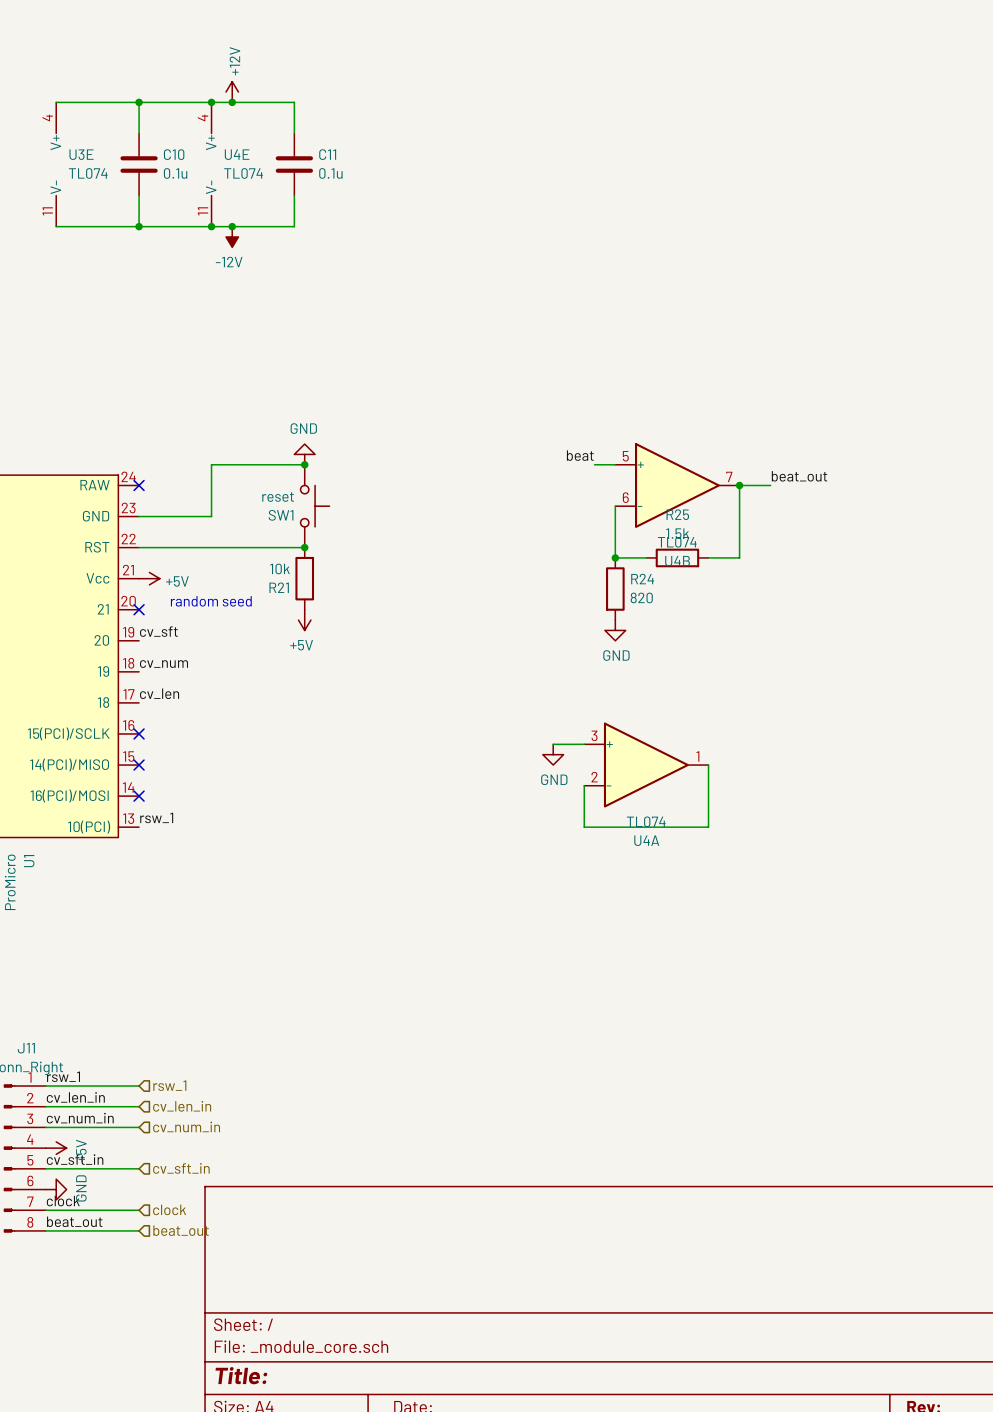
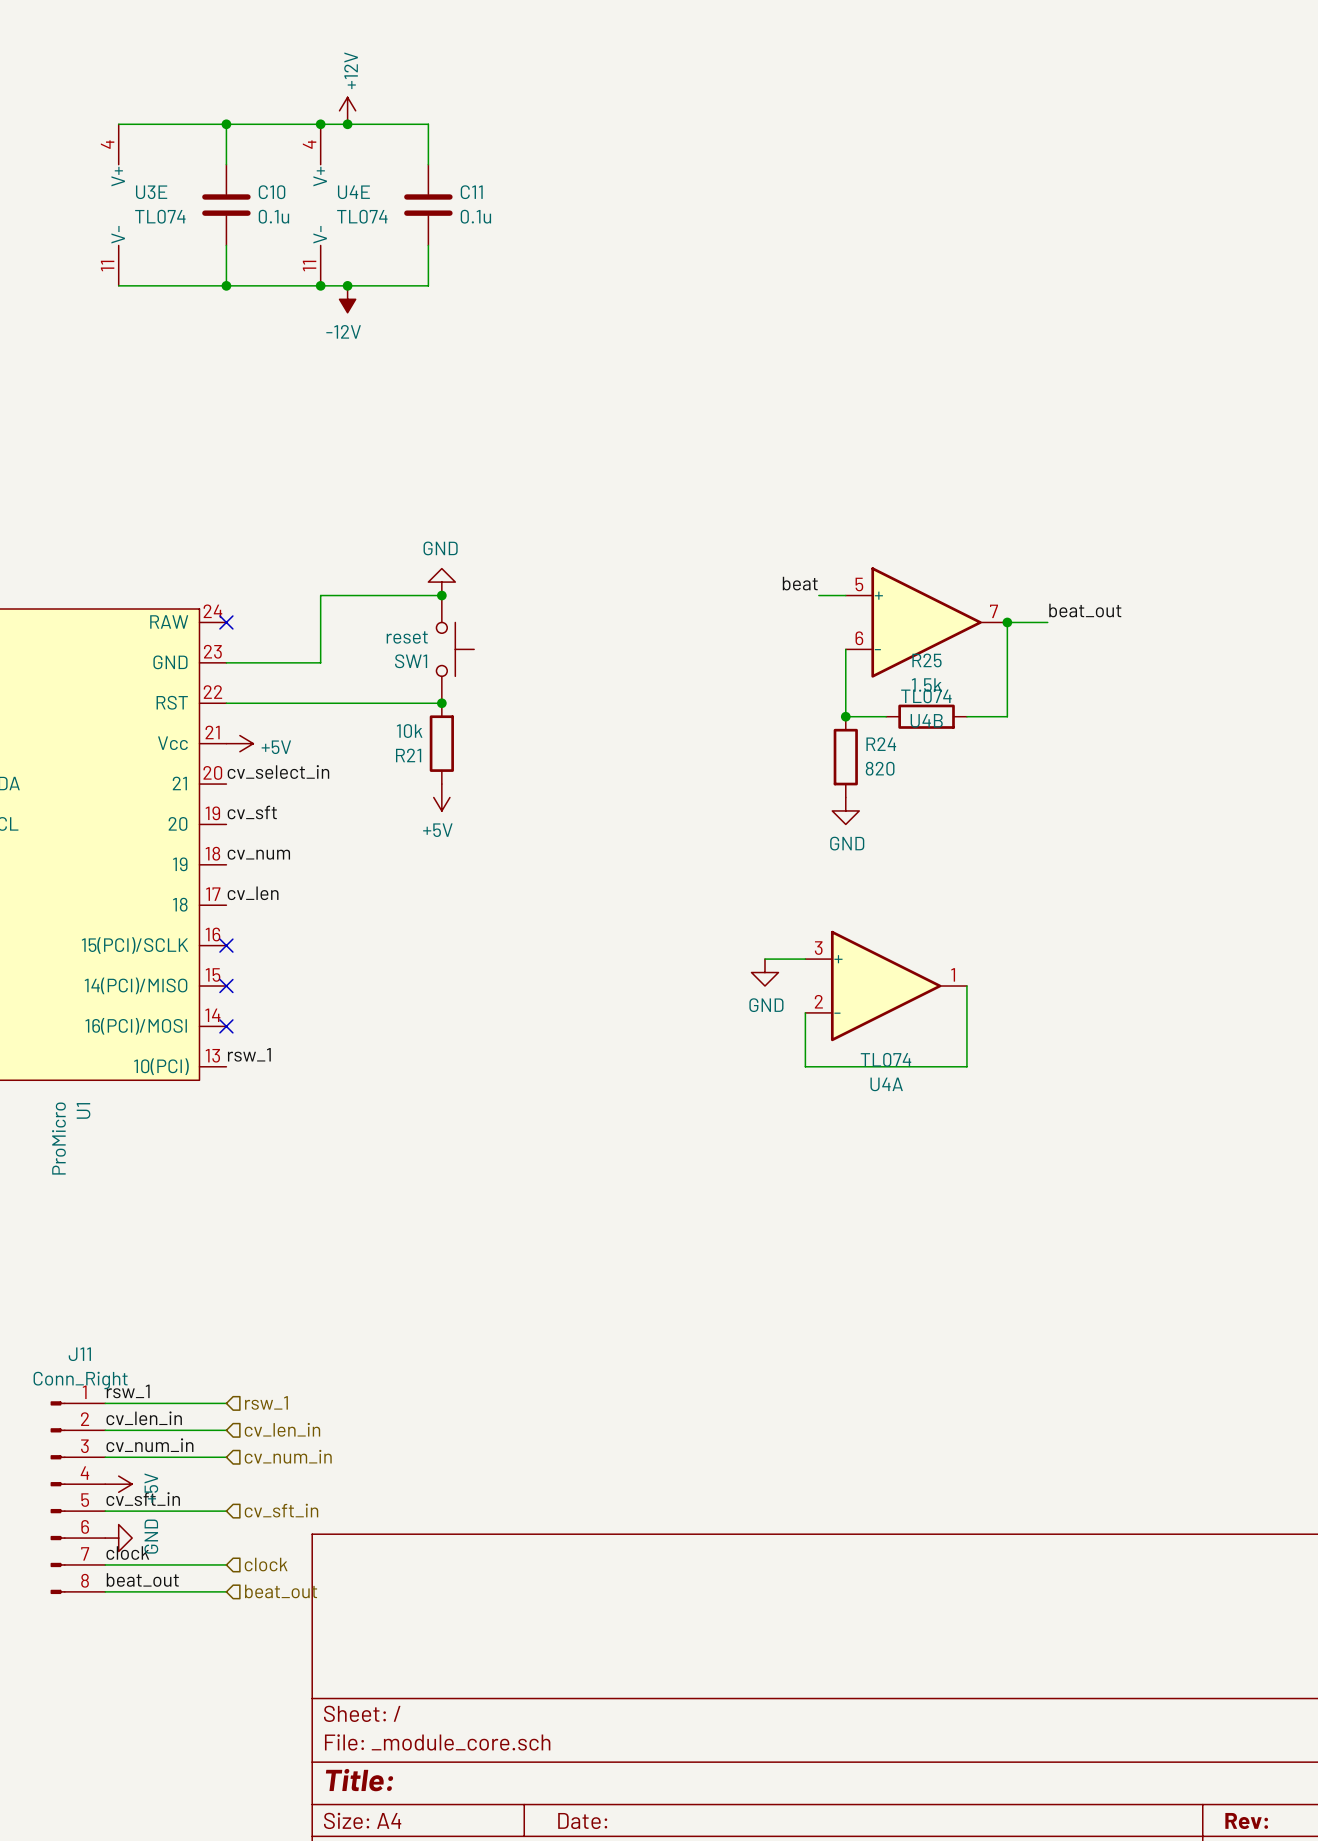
label: none -> cv_select_in (278, 772)
text: random seed (211, 601) -> none
no-connect mark: (139, 609) -> none

